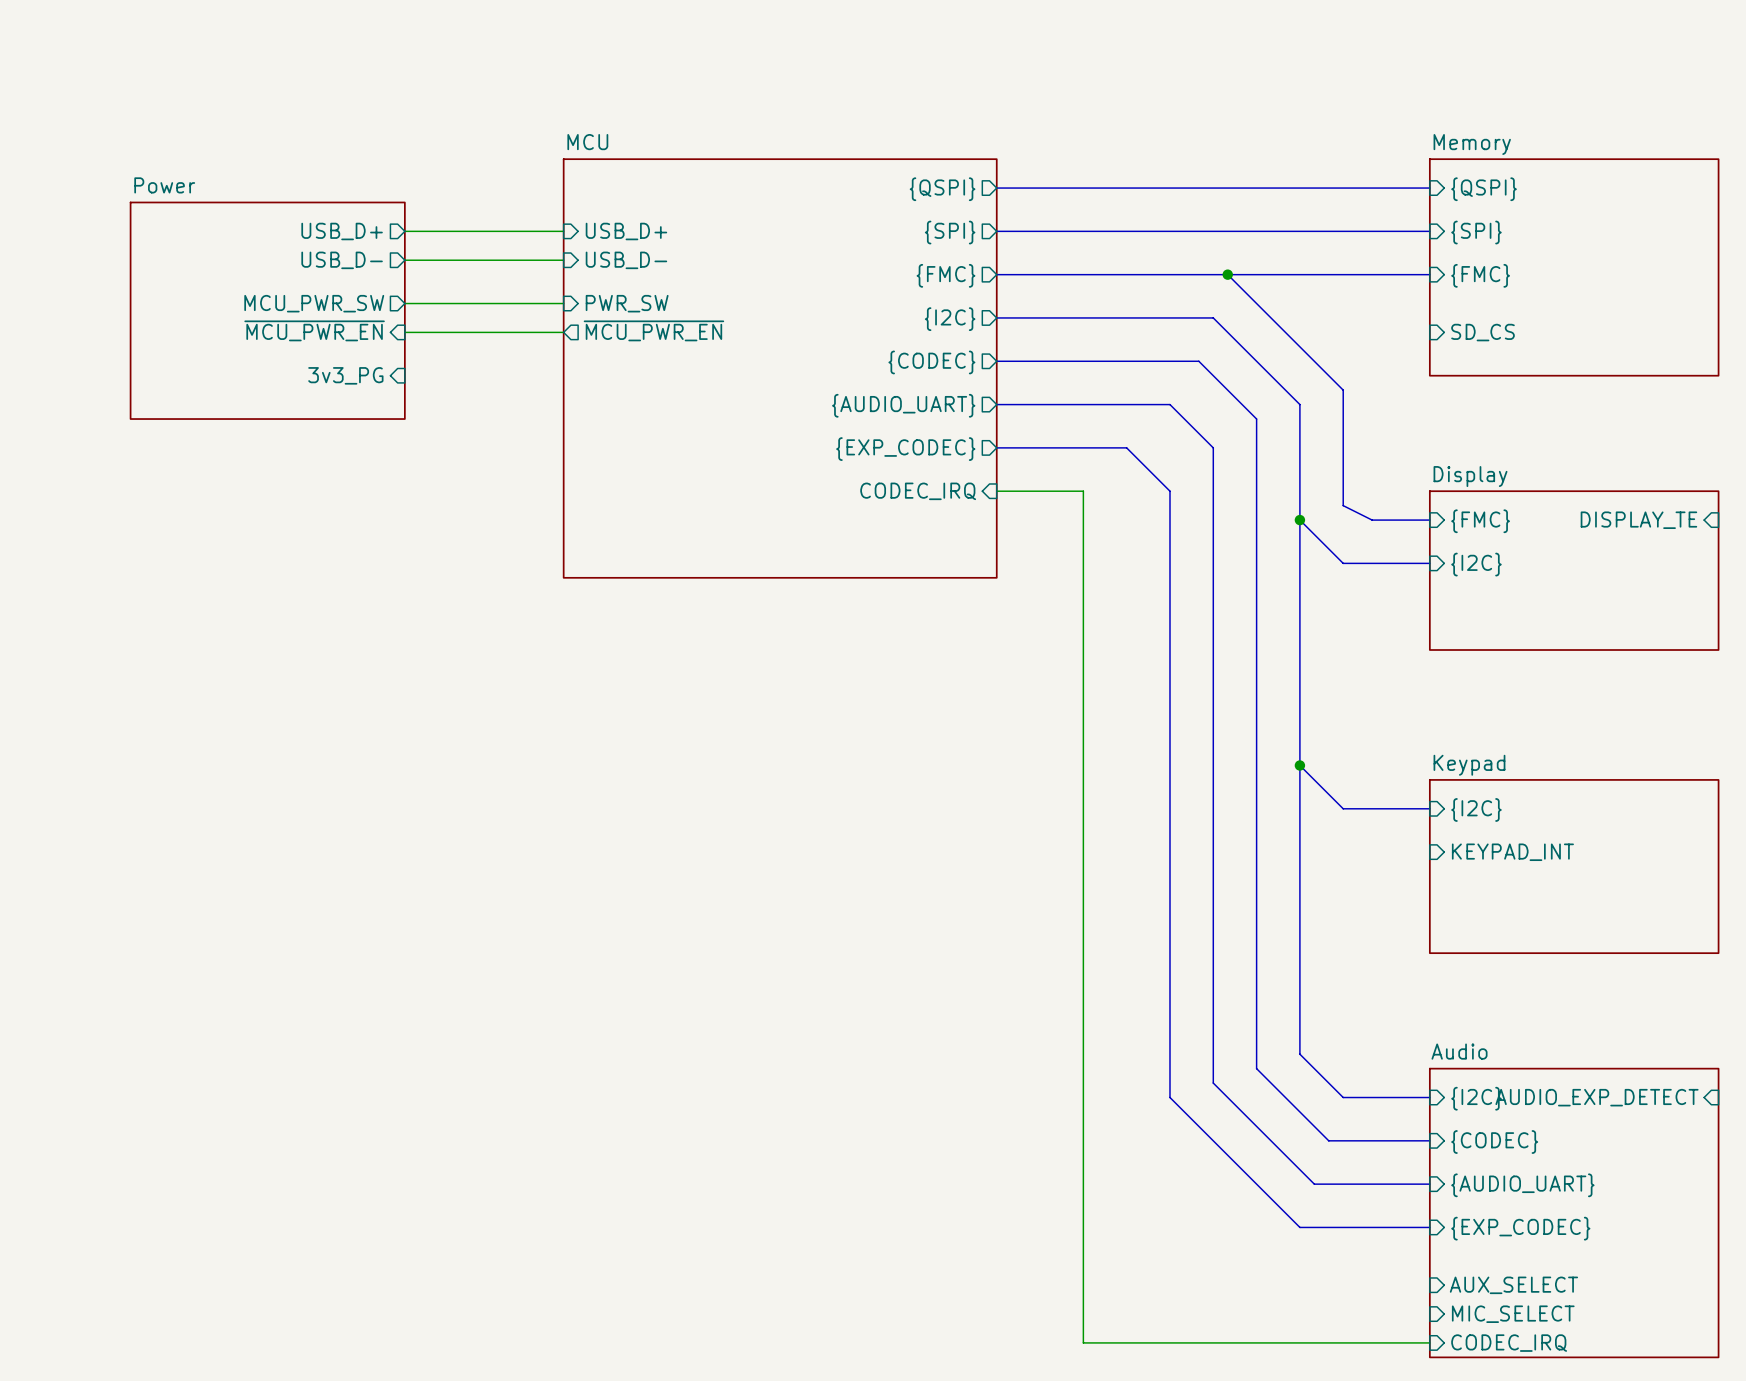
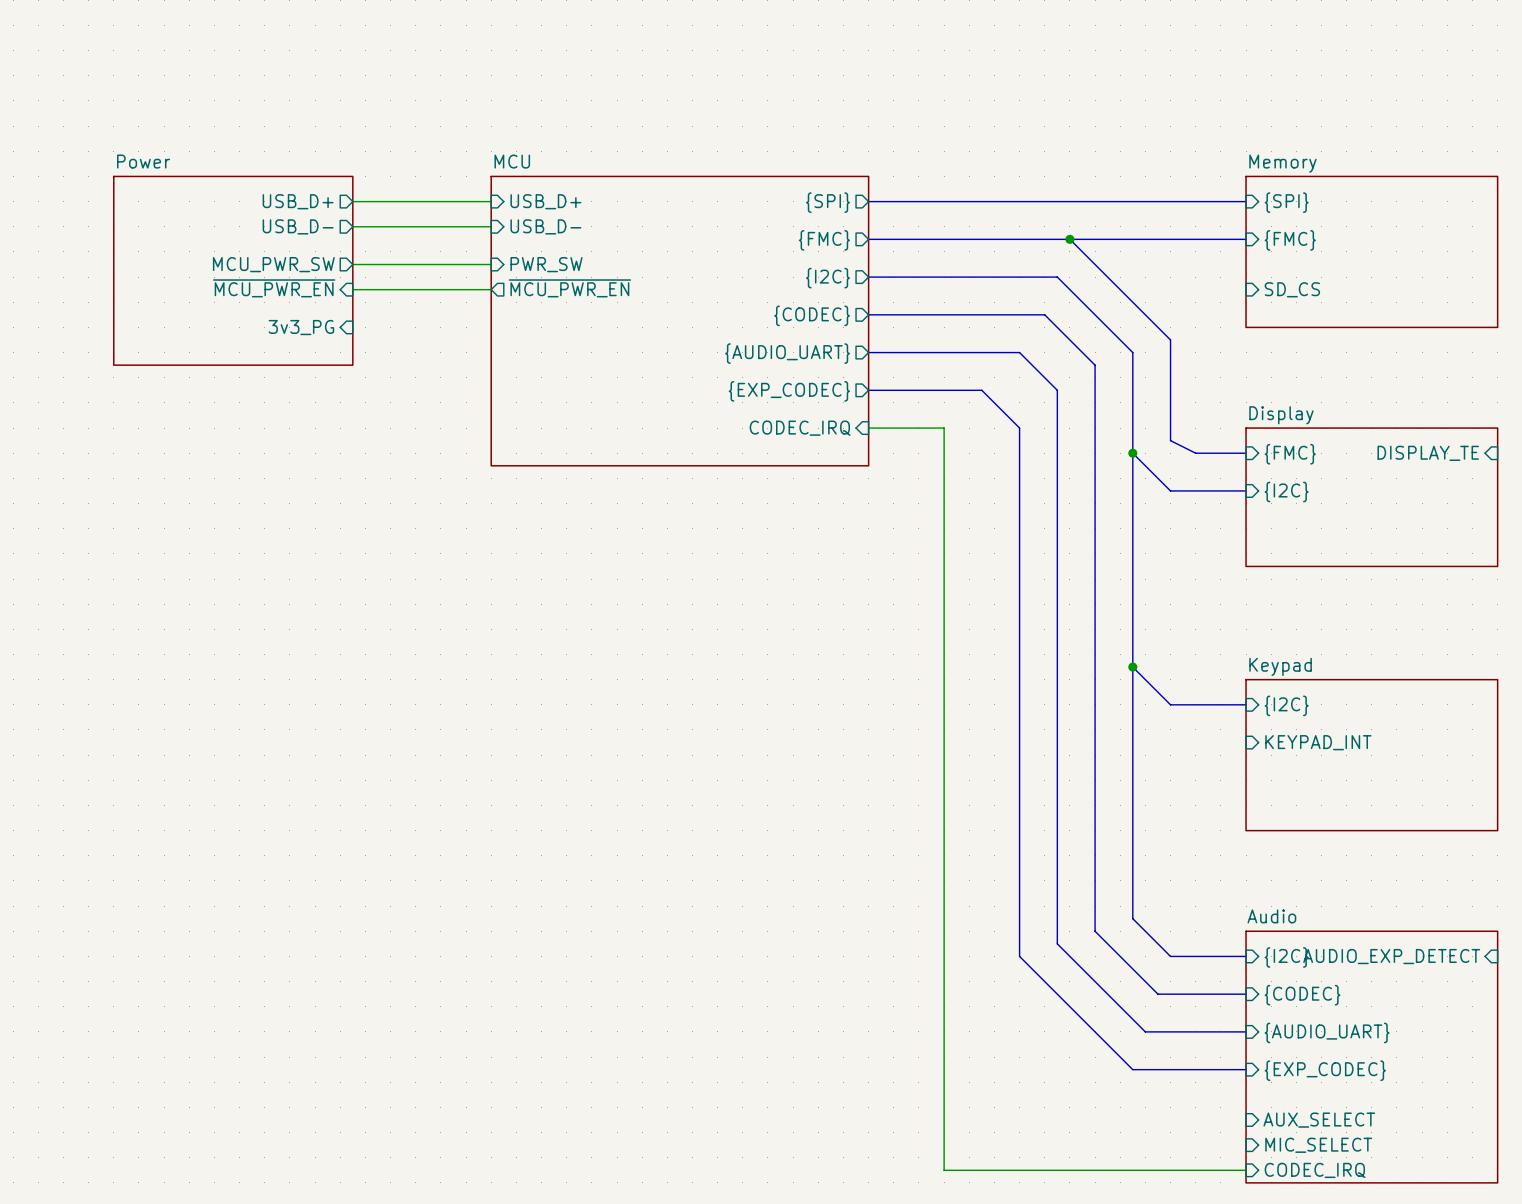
sheet MCU name position: MCU (587, 142) -> MCU (512, 161)
sheet MCU shape: [562, 158, 998, 579] -> [490, 175, 870, 467]
bus: (996, 188) (1429, 188) -> none
sheet pin: {QSPI} (942, 189) -> none
sheet pin: {QSPI} (1484, 189) -> none
sheet Memory: (1574, 267) -> none
sheet Memory: none -> (1371, 251)

